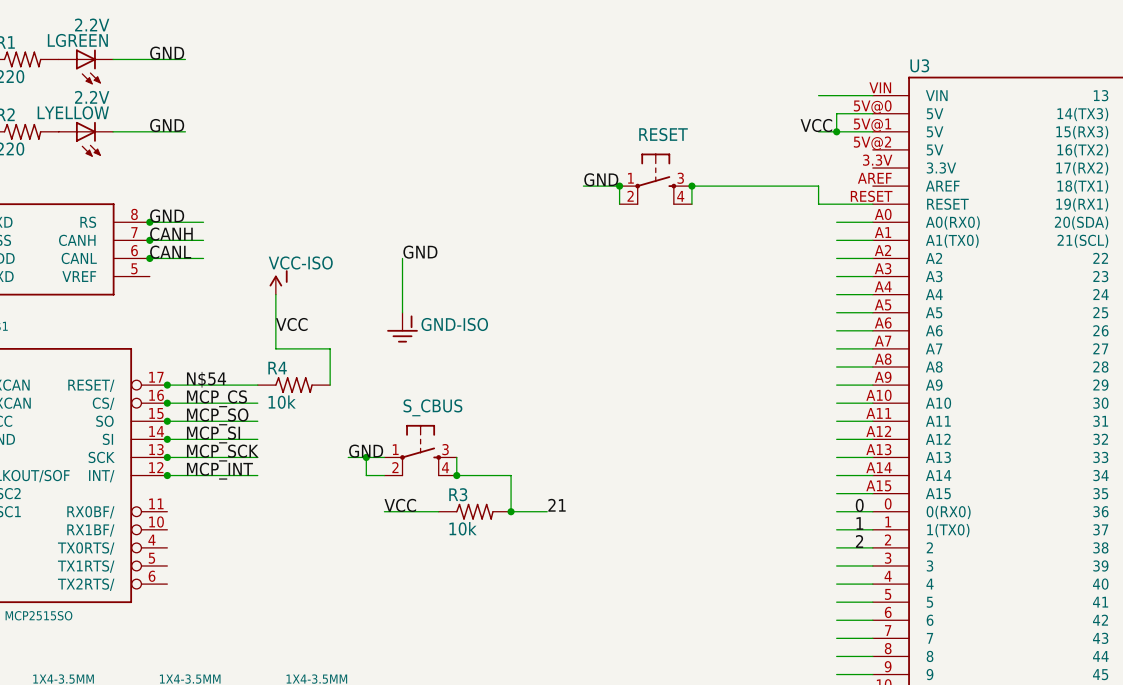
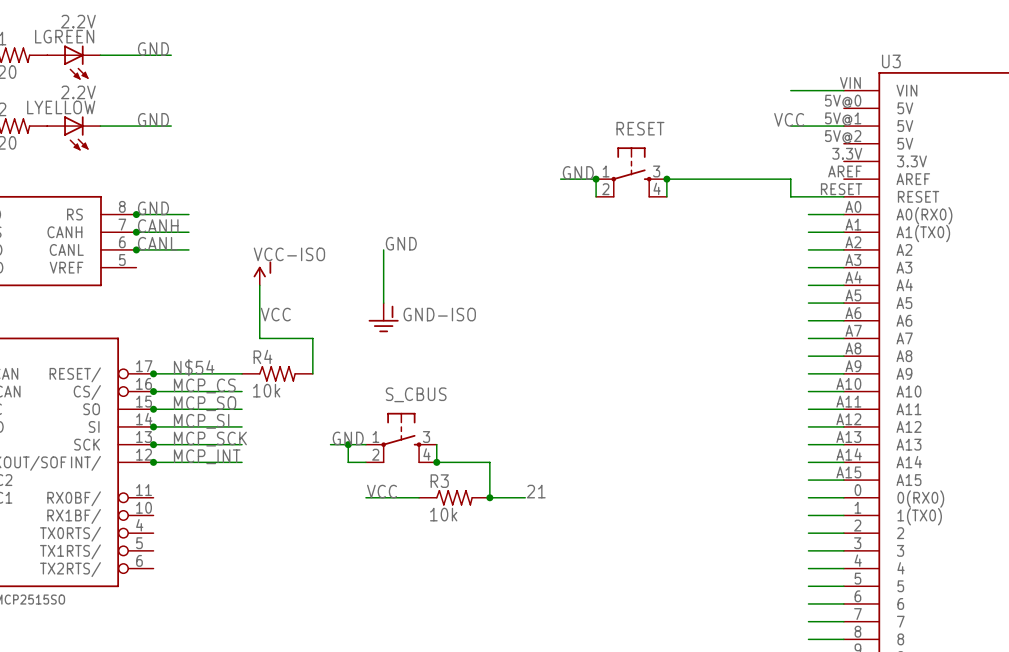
wire: (872, 113) (836, 113) (836, 131) -> none
junction: (836, 131) -> none
label: 0 (859, 505) -> none
label: 1 (859, 523) -> none
label: 2 (859, 541) -> none

